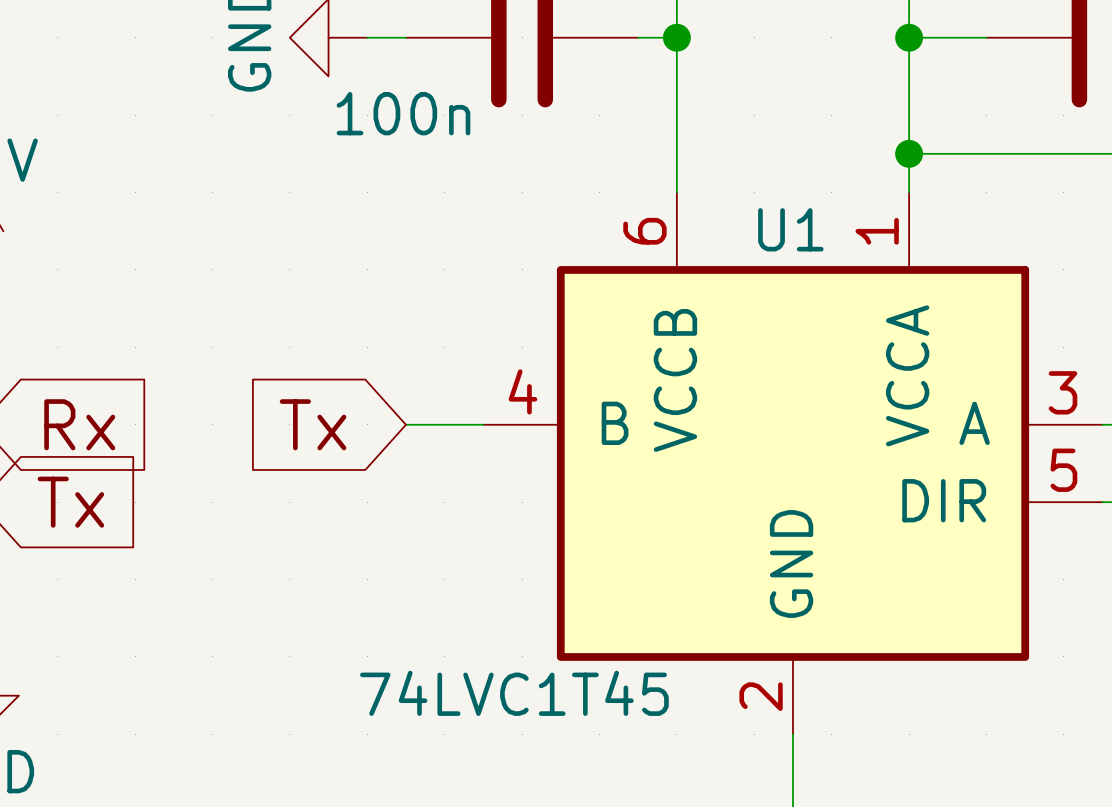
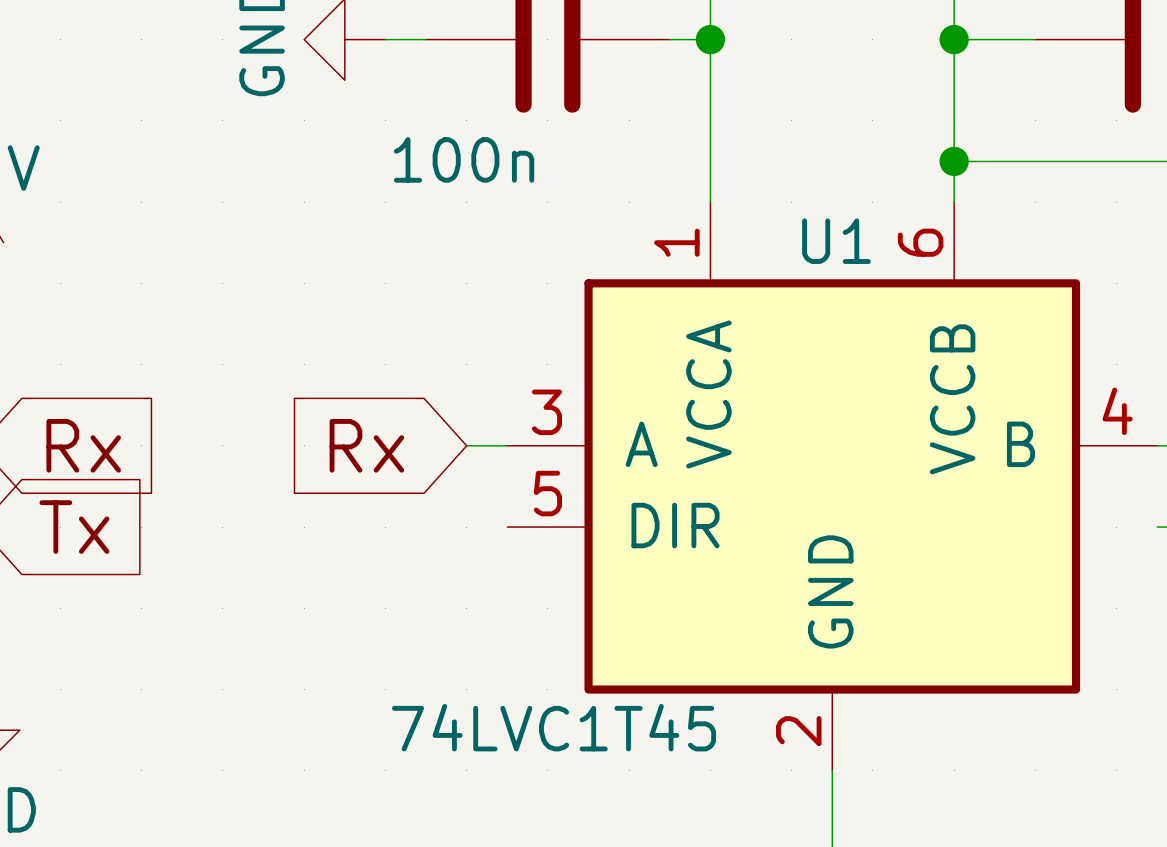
part value position: 100n (403, 113) -> 100n (464, 159)
global label: Tx (313, 424) -> none
global label: none -> Rx (366, 445)
wire: (405, 424) (444, 424) -> none
U1 flip: as is (792, 463) -> left-right (832, 486)

